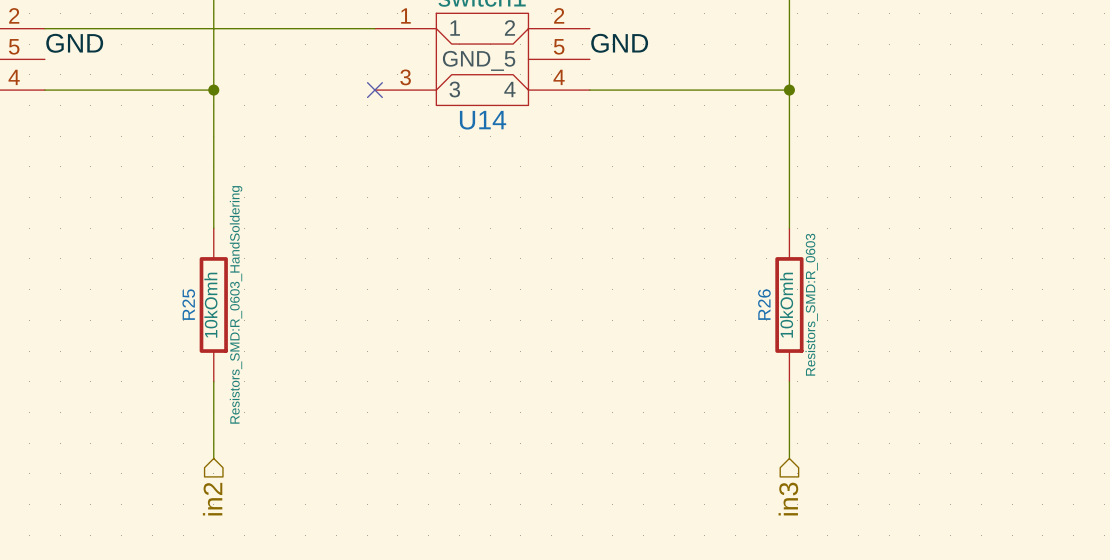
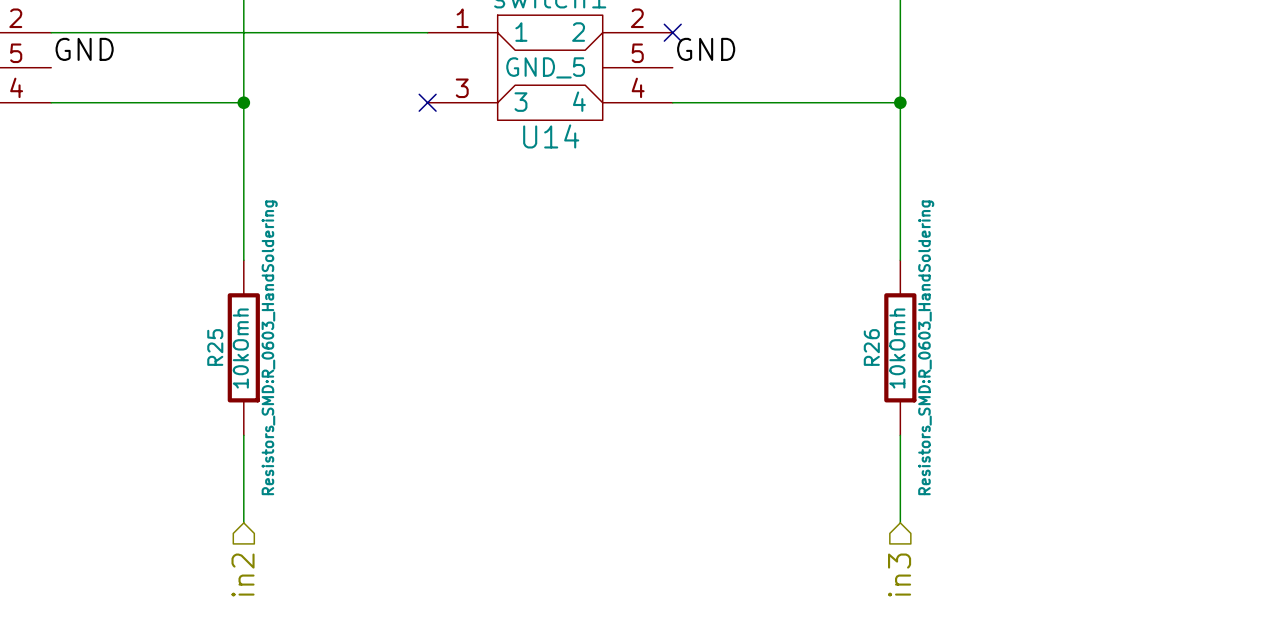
no-connect mark: none -> (672, 32)
R26 text: Resistors_SMD:R_0603 (811, 304) -> Resistors_SMD:R_0603_HandSoldering (926, 347)

